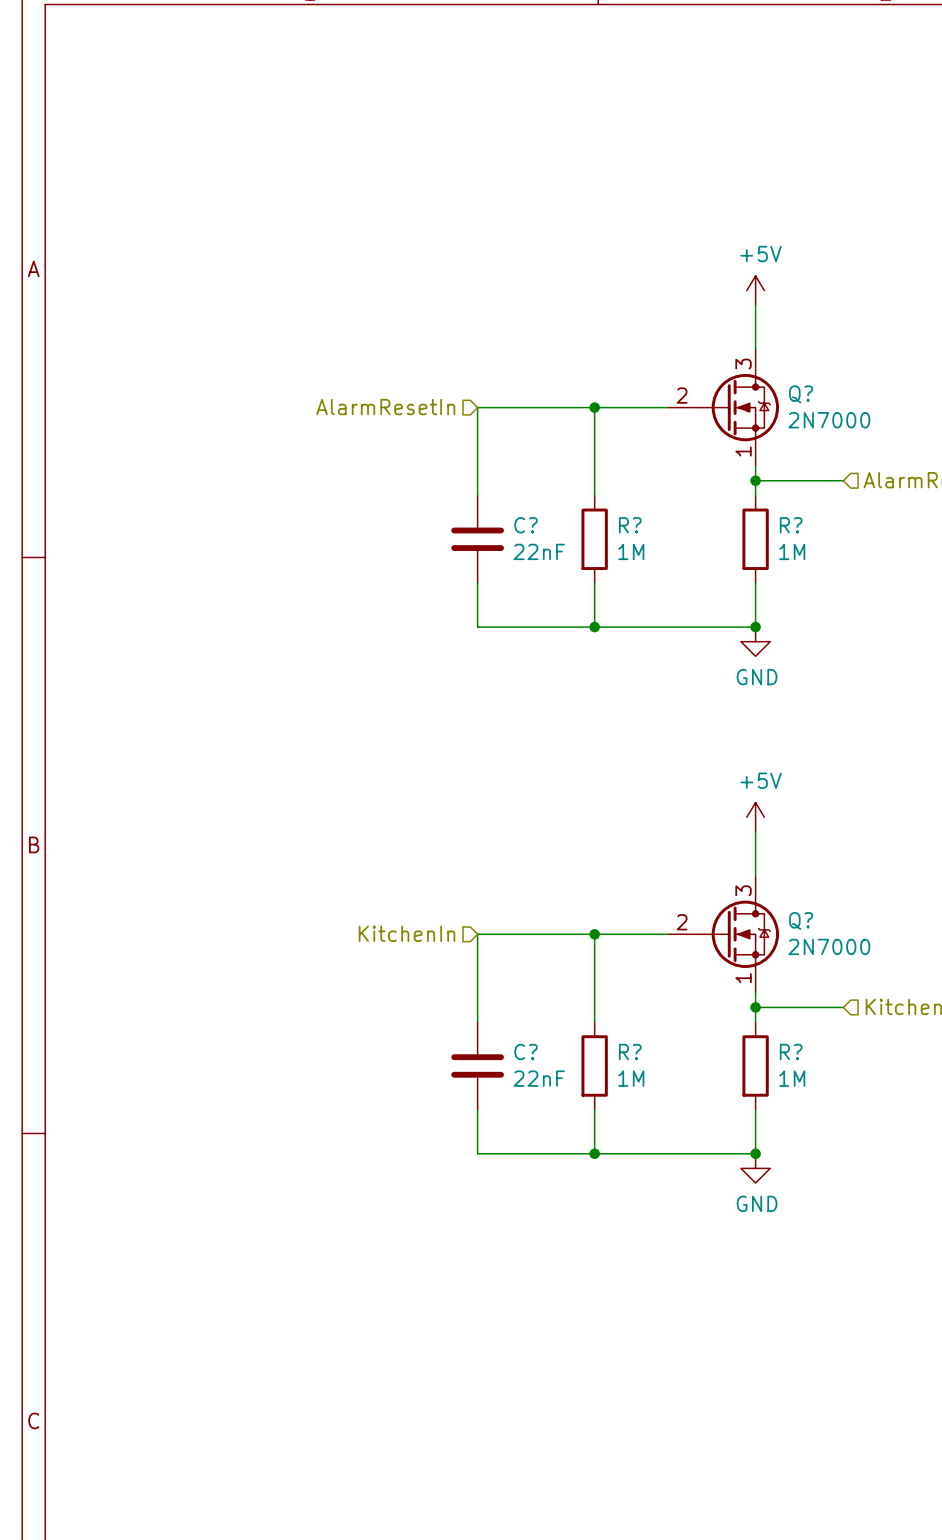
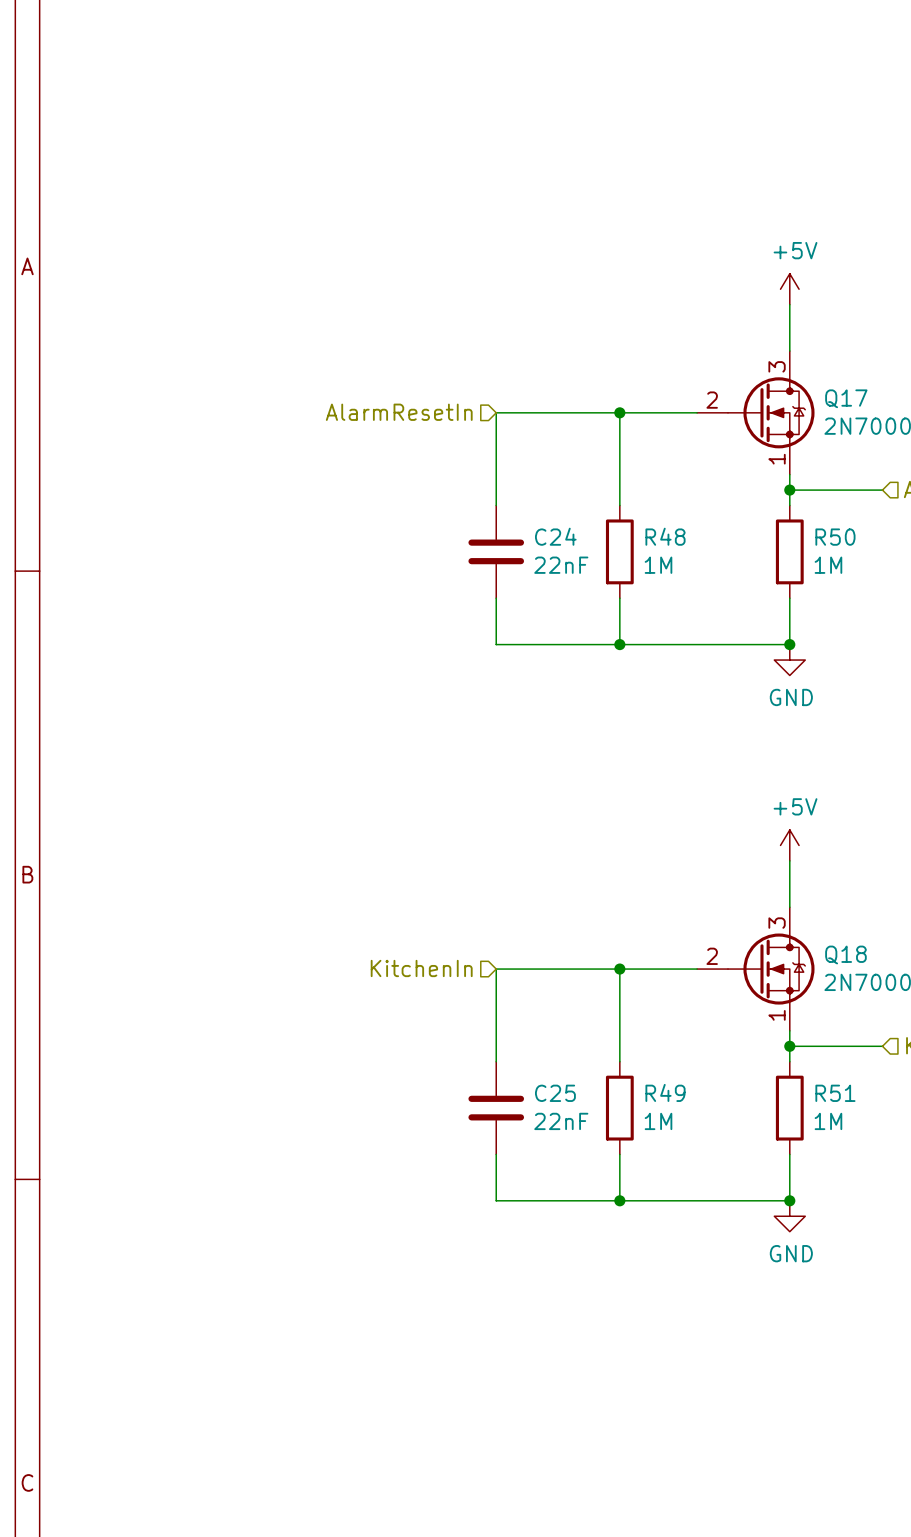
Q? name: Q? (801, 394) -> Q17 (846, 398)
C? name: C? (526, 525) -> C24 (555, 536)
R? name: R? (630, 525) -> R48 (665, 536)
R? name: R? (791, 525) -> R50 (835, 537)
Q? name: Q? (801, 920) -> Q18 (845, 954)
C? name: C? (526, 1051) -> C25 (555, 1093)
R? name: R? (630, 1051) -> R49 (665, 1092)
R? name: R? (791, 1051) -> R51 (835, 1093)

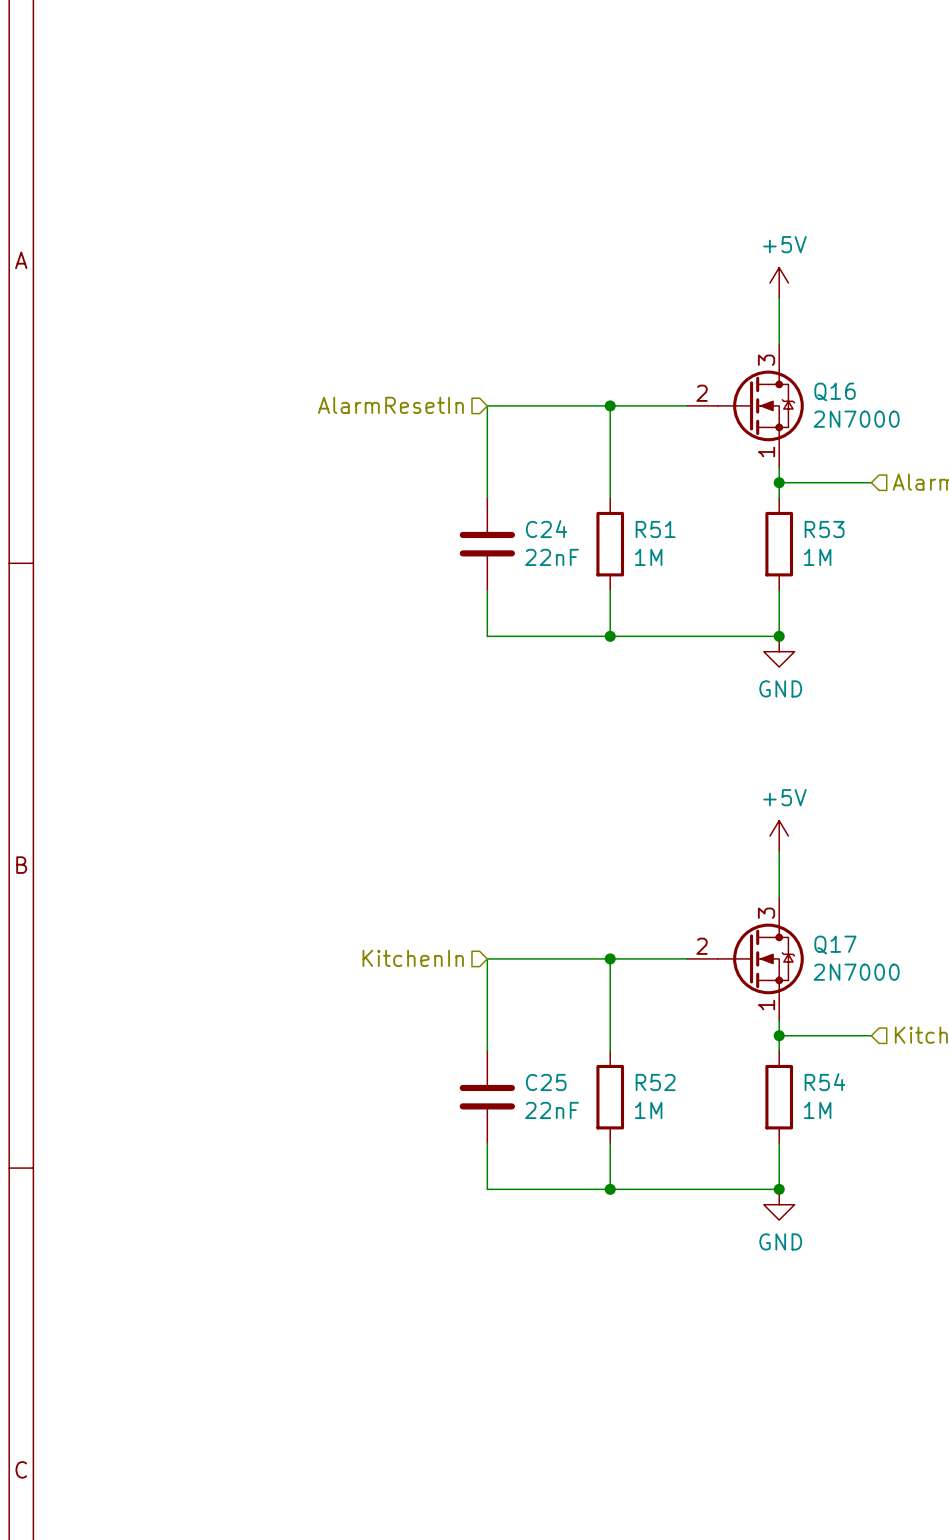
Q17 name: Q17 (846, 398) -> Q16 (835, 391)
R48 name: R48 (665, 536) -> R51 (655, 529)
R50 name: R50 (835, 537) -> R53 (824, 529)
Q18 name: Q18 (845, 954) -> Q17 (835, 944)
R49 name: R49 (665, 1092) -> R52 (655, 1082)
R51 name: R51 (835, 1093) -> R54 (824, 1082)

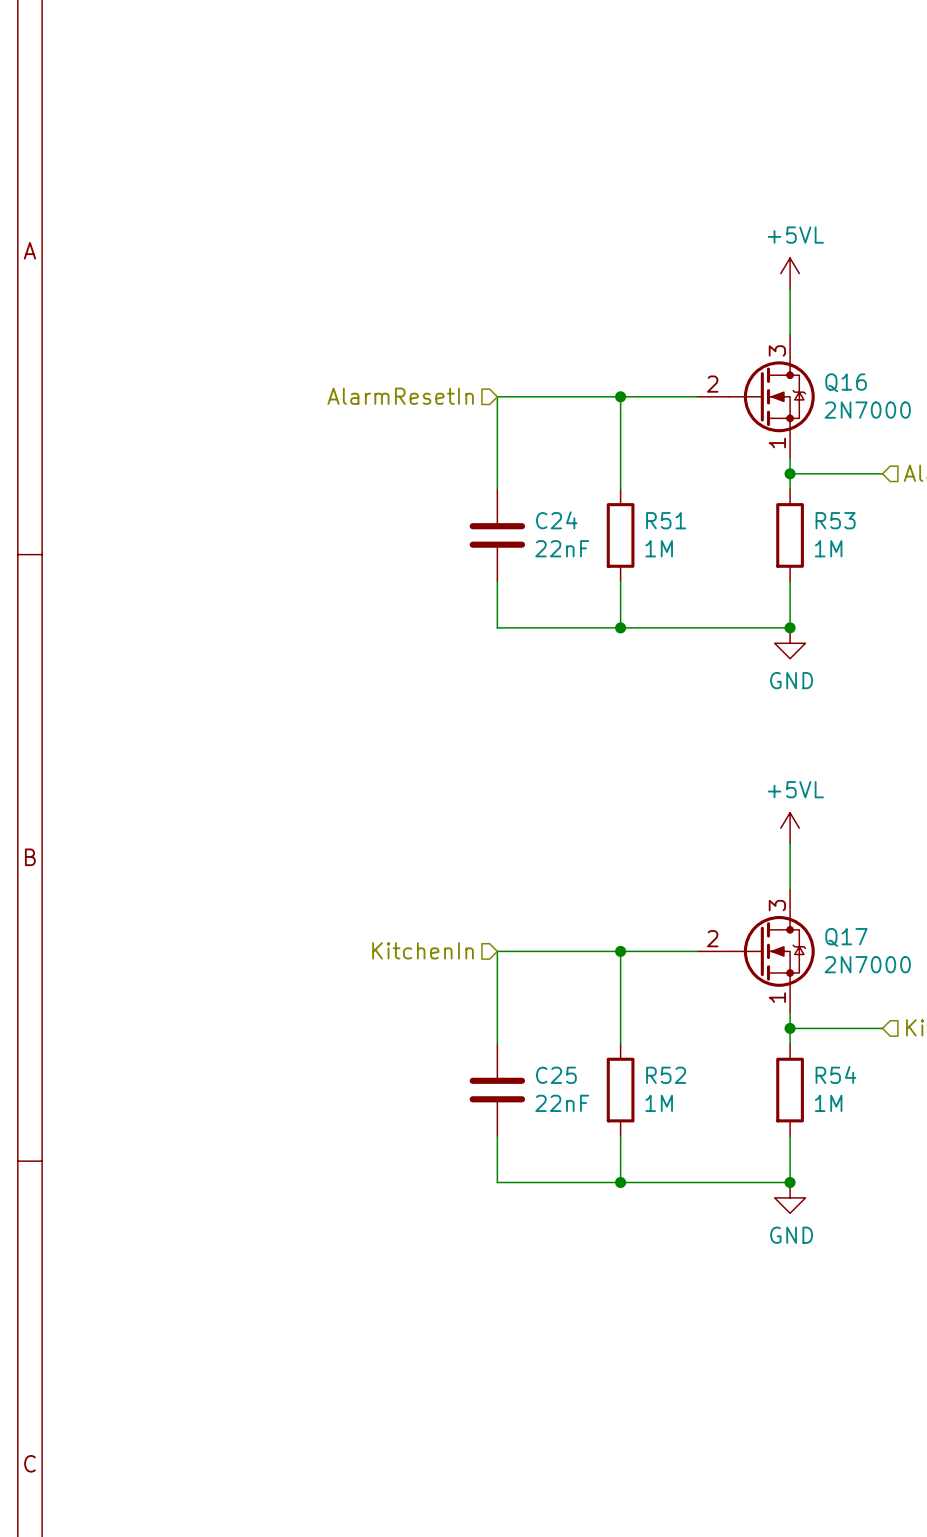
power symbol: +5V (779, 283) -> +5VL (790, 273)
power symbol: +5V (779, 836) -> +5VL (790, 828)

